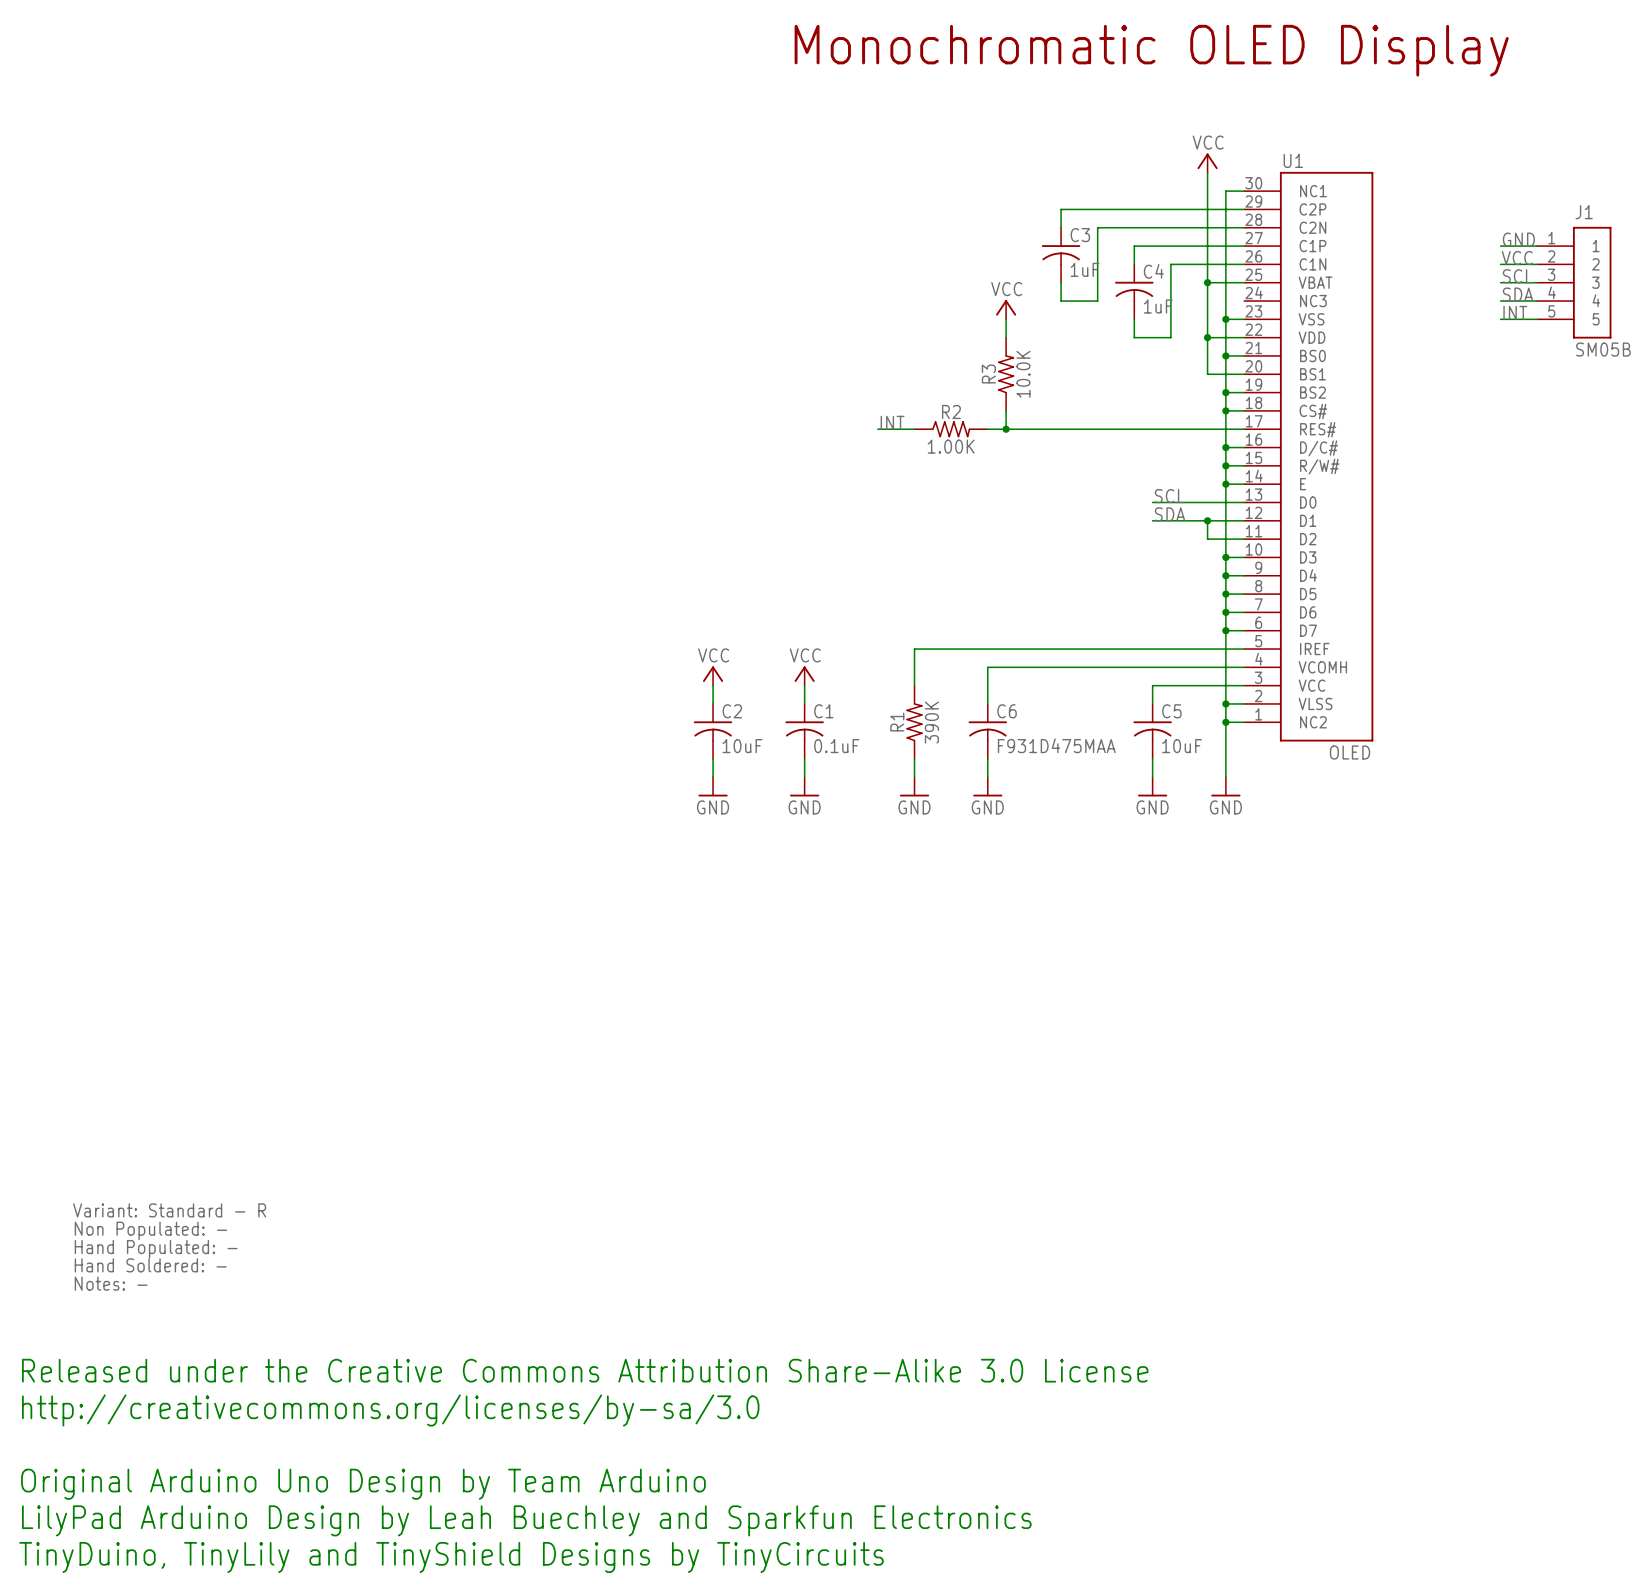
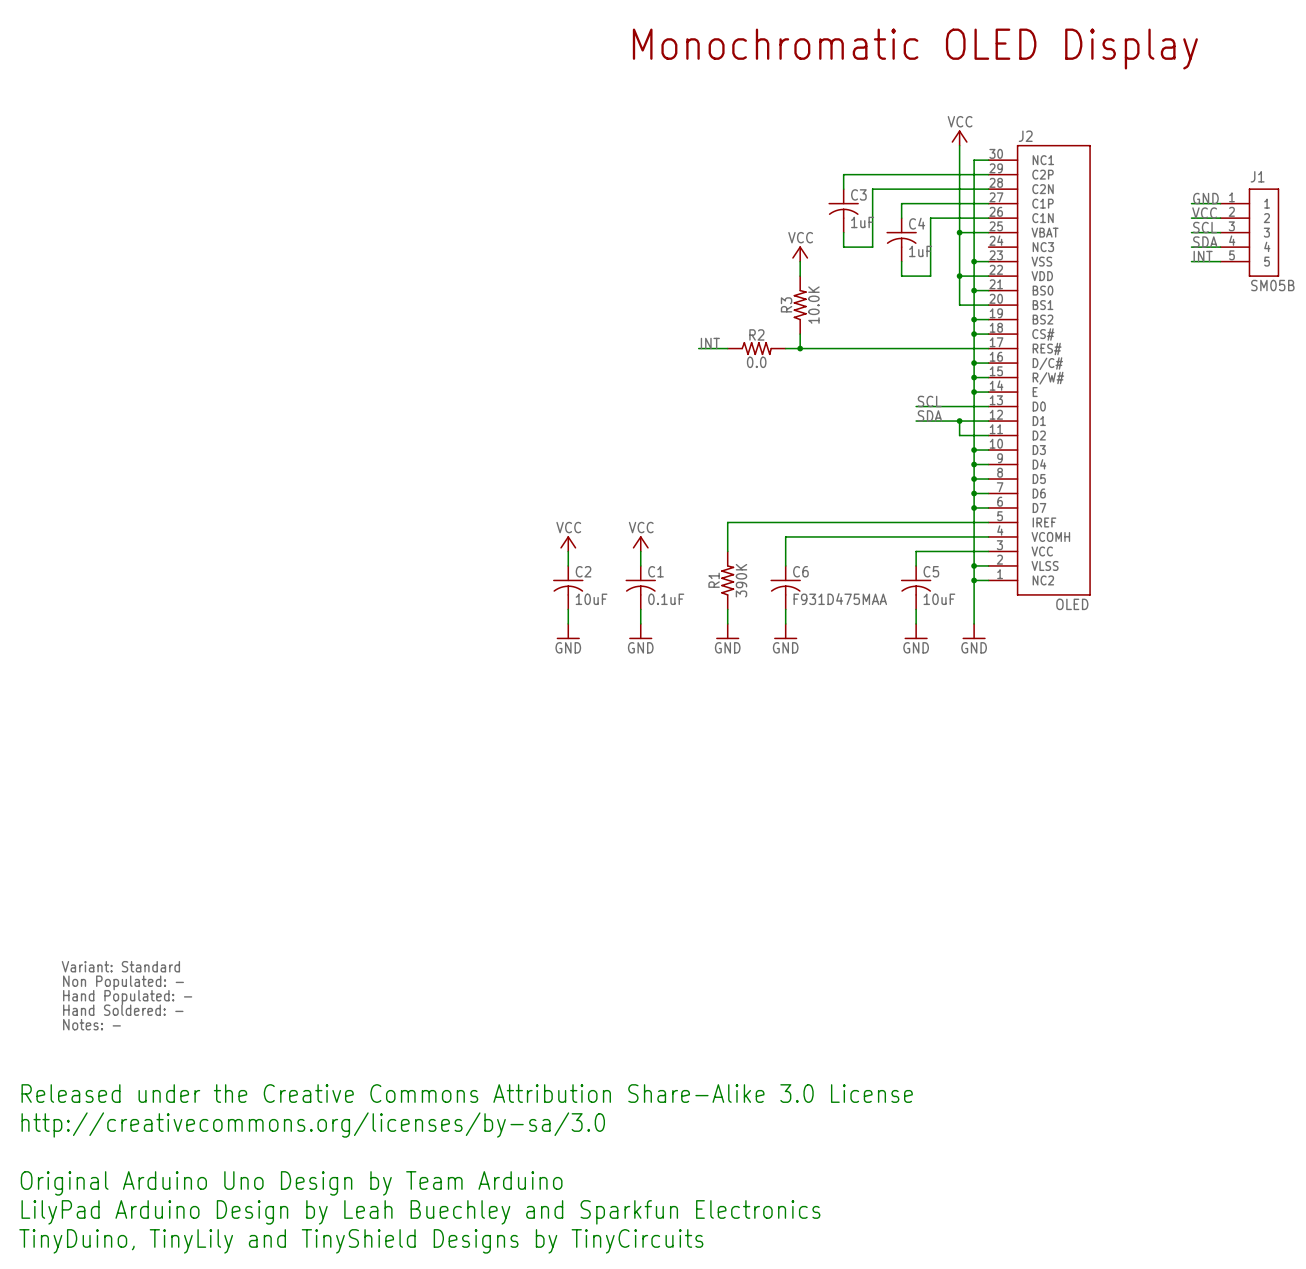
U1 name: U1 (1293, 160) -> J2 (1025, 136)
R2 value: 1.00K (951, 446) -> 0.0 (756, 362)
text: Variant: Standard - R (169, 1210) -> Variant: Standard (120, 966)

